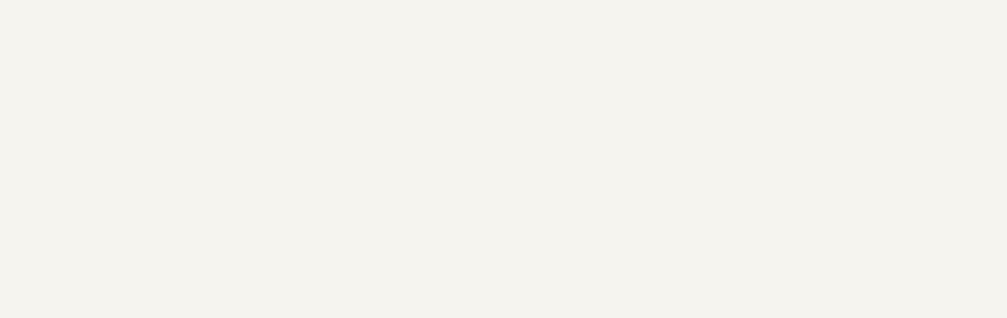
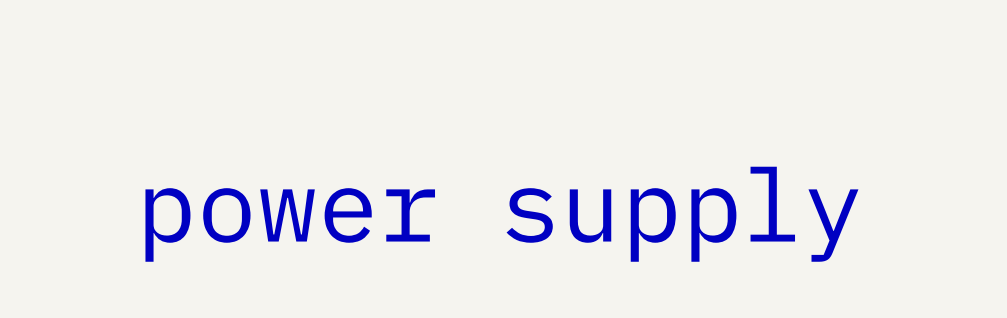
text: none -> power supply (501, 214)

